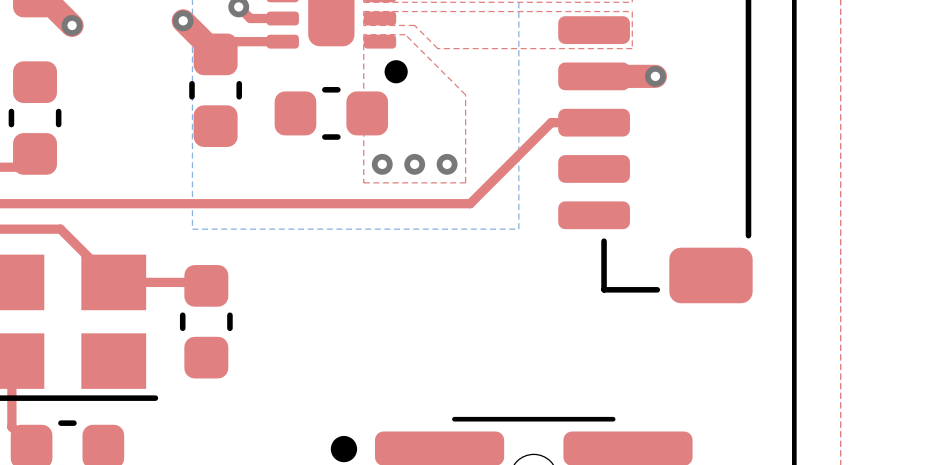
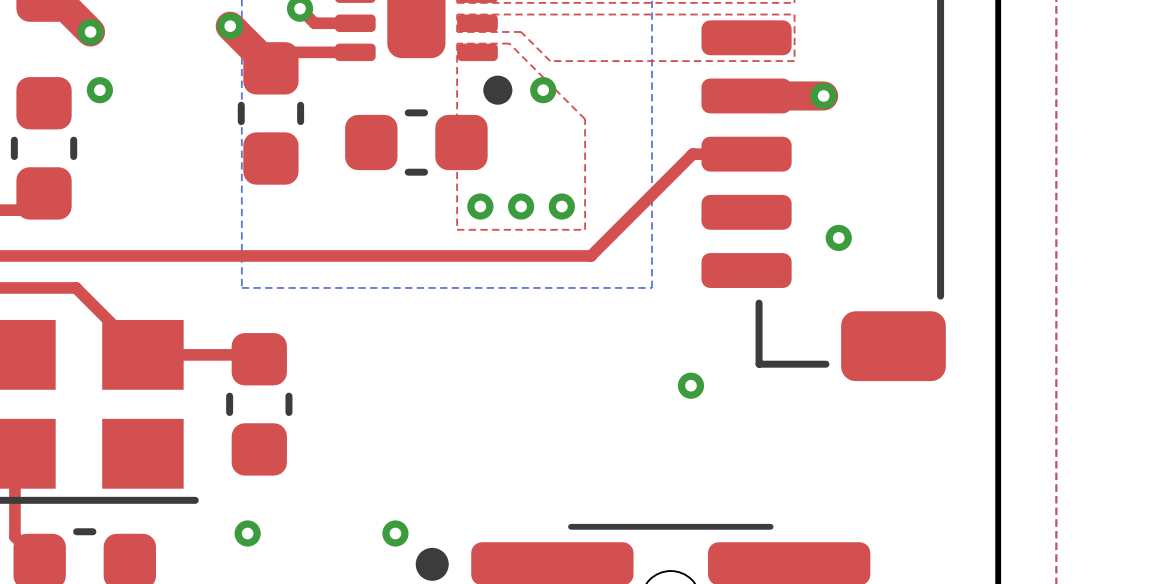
via: none -> (99, 90)
via: none -> (543, 90)
via: none -> (838, 237)
via: none -> (690, 385)
via: none -> (247, 533)
via: none -> (395, 533)

